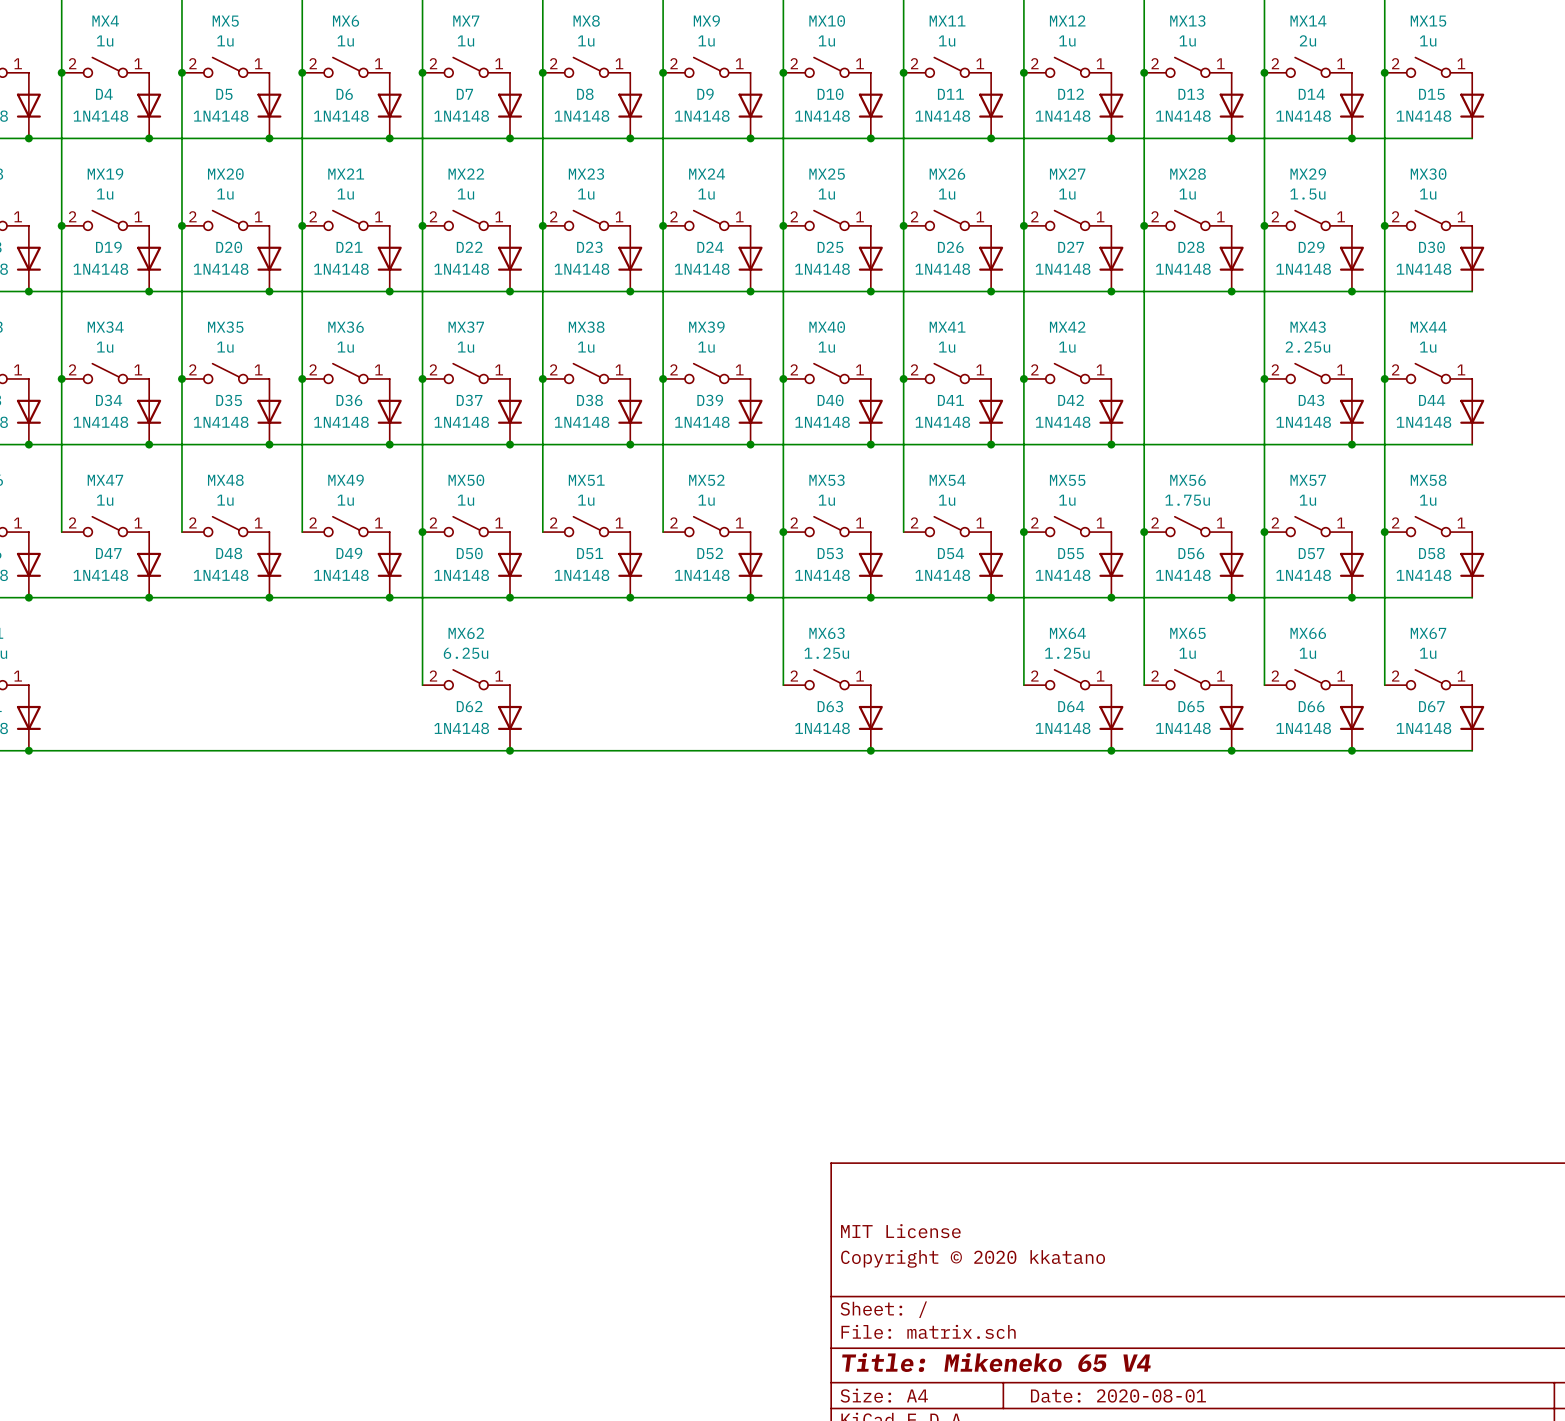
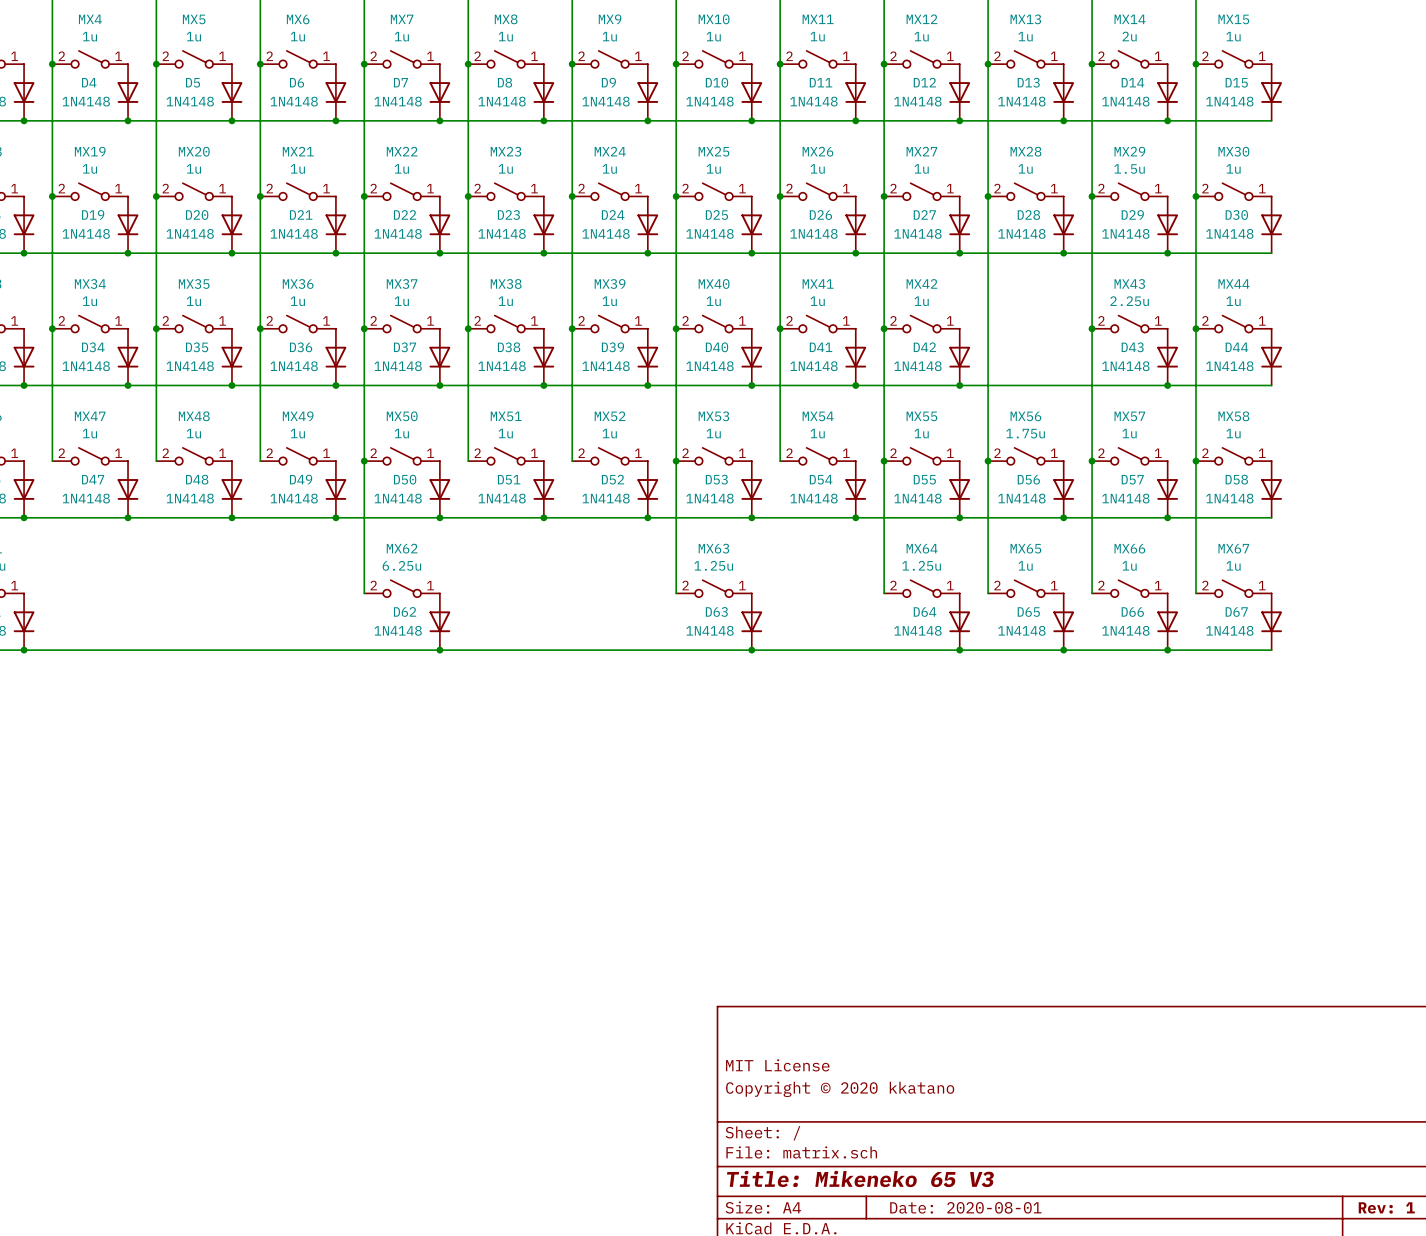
title block: Title: Mikeneko 65 V4 (996, 1362) -> Title: Mikeneko 65 V3 (860, 1178)

